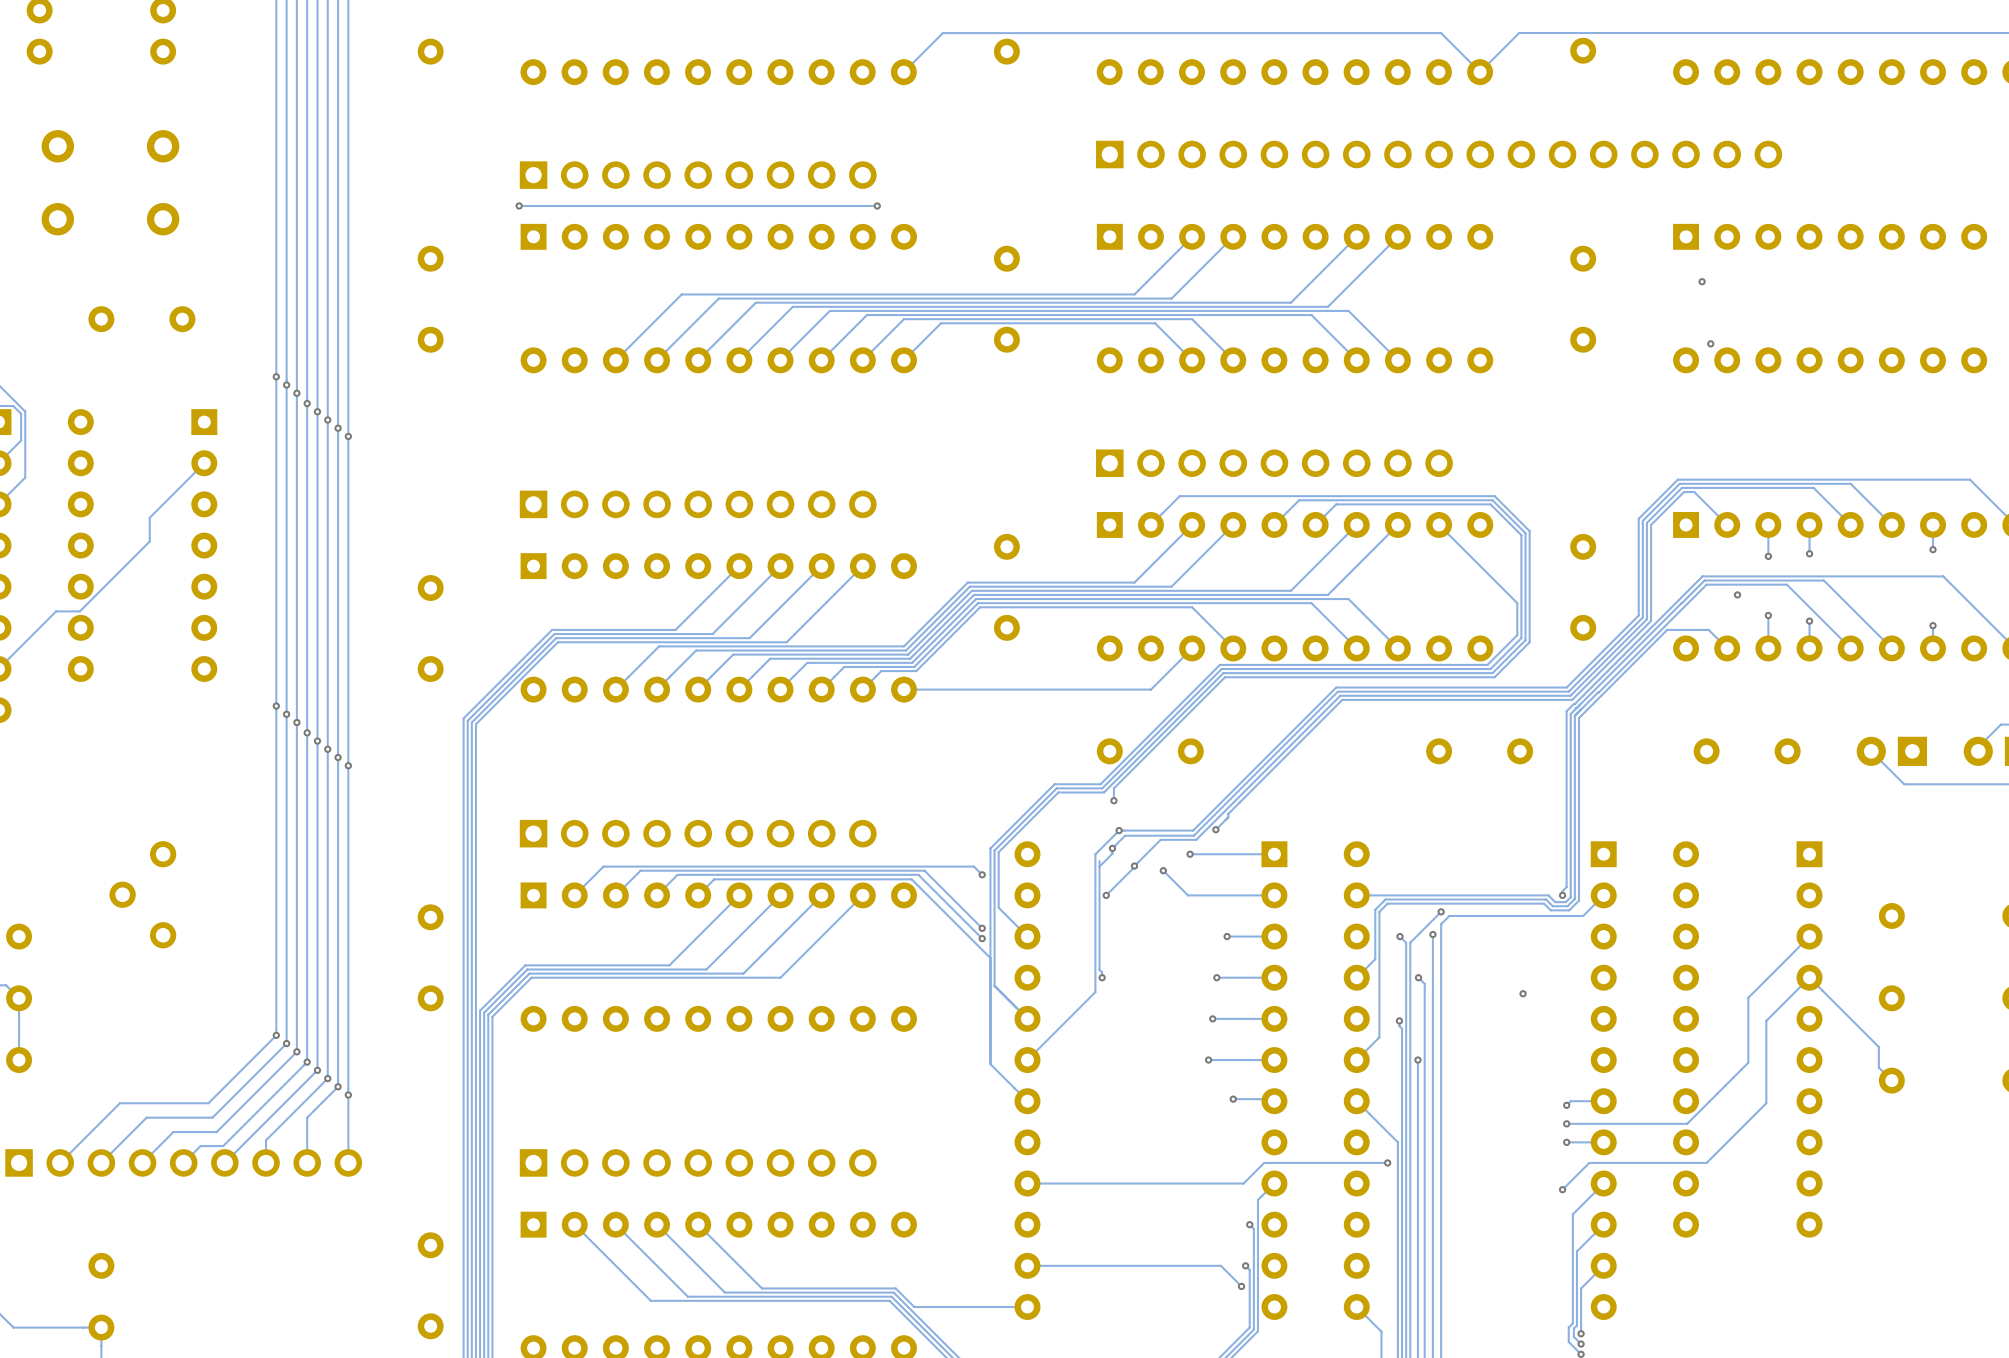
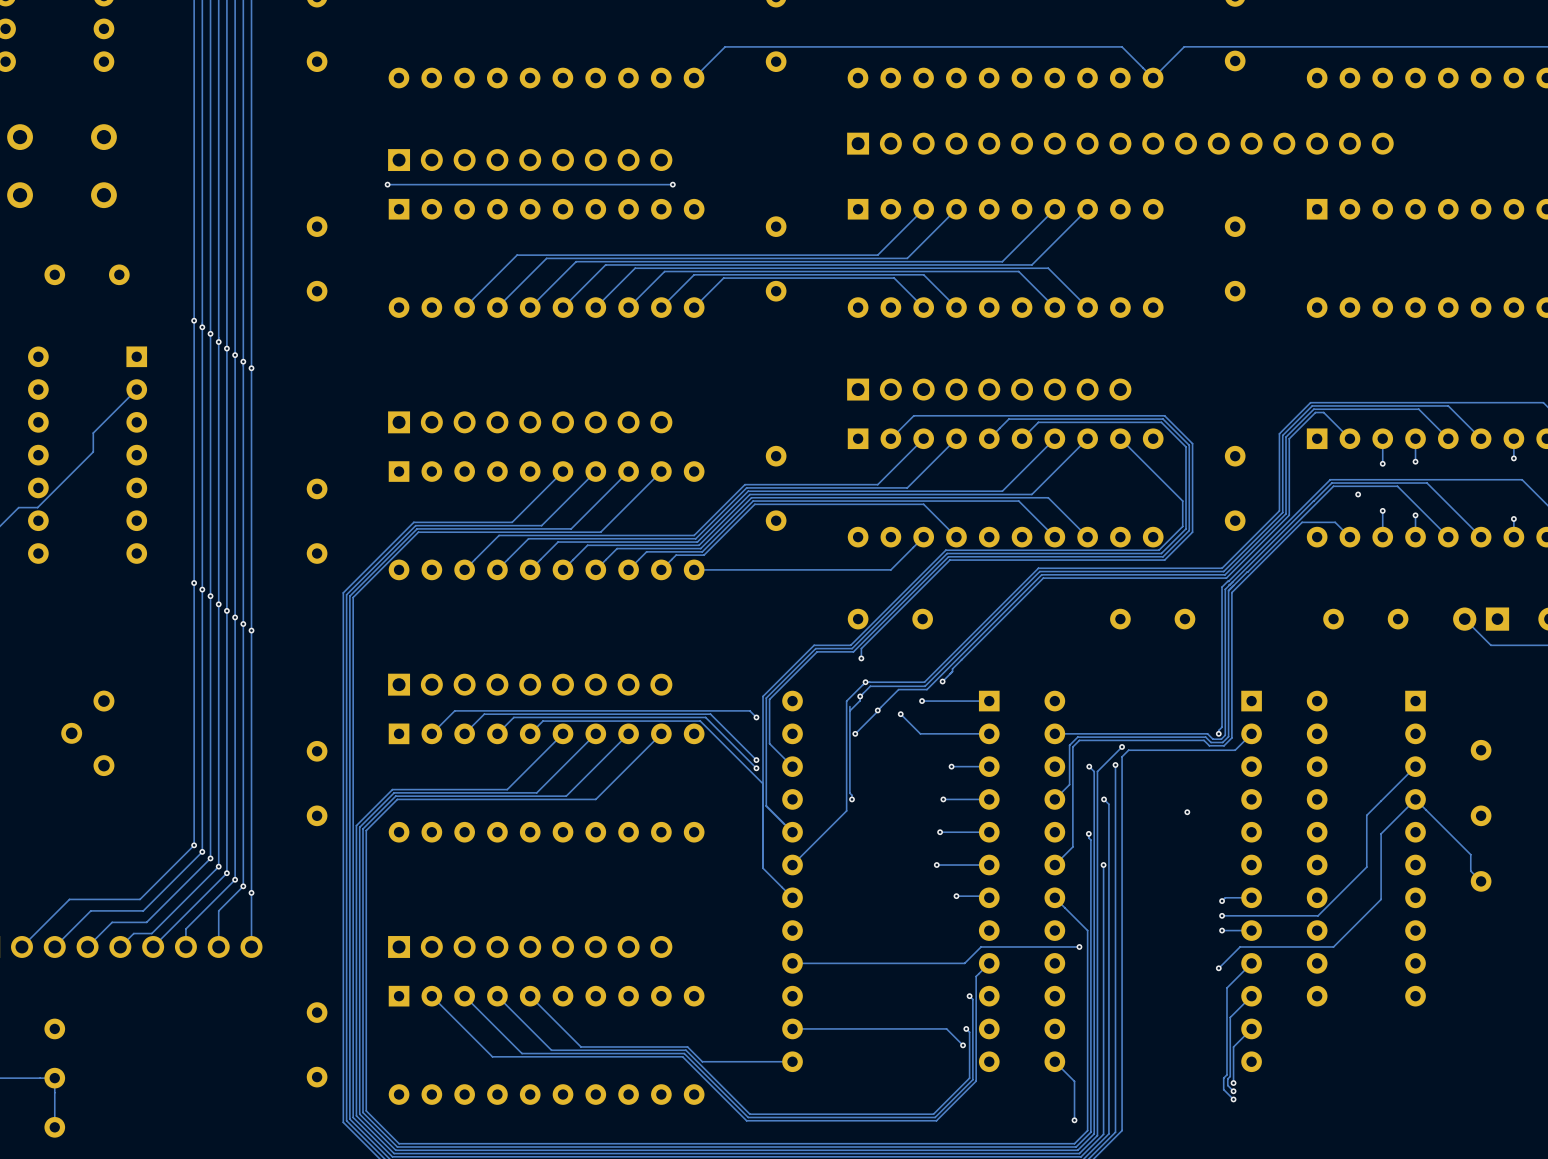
via: (1702, 281) -> none
via: (1710, 343) -> none

